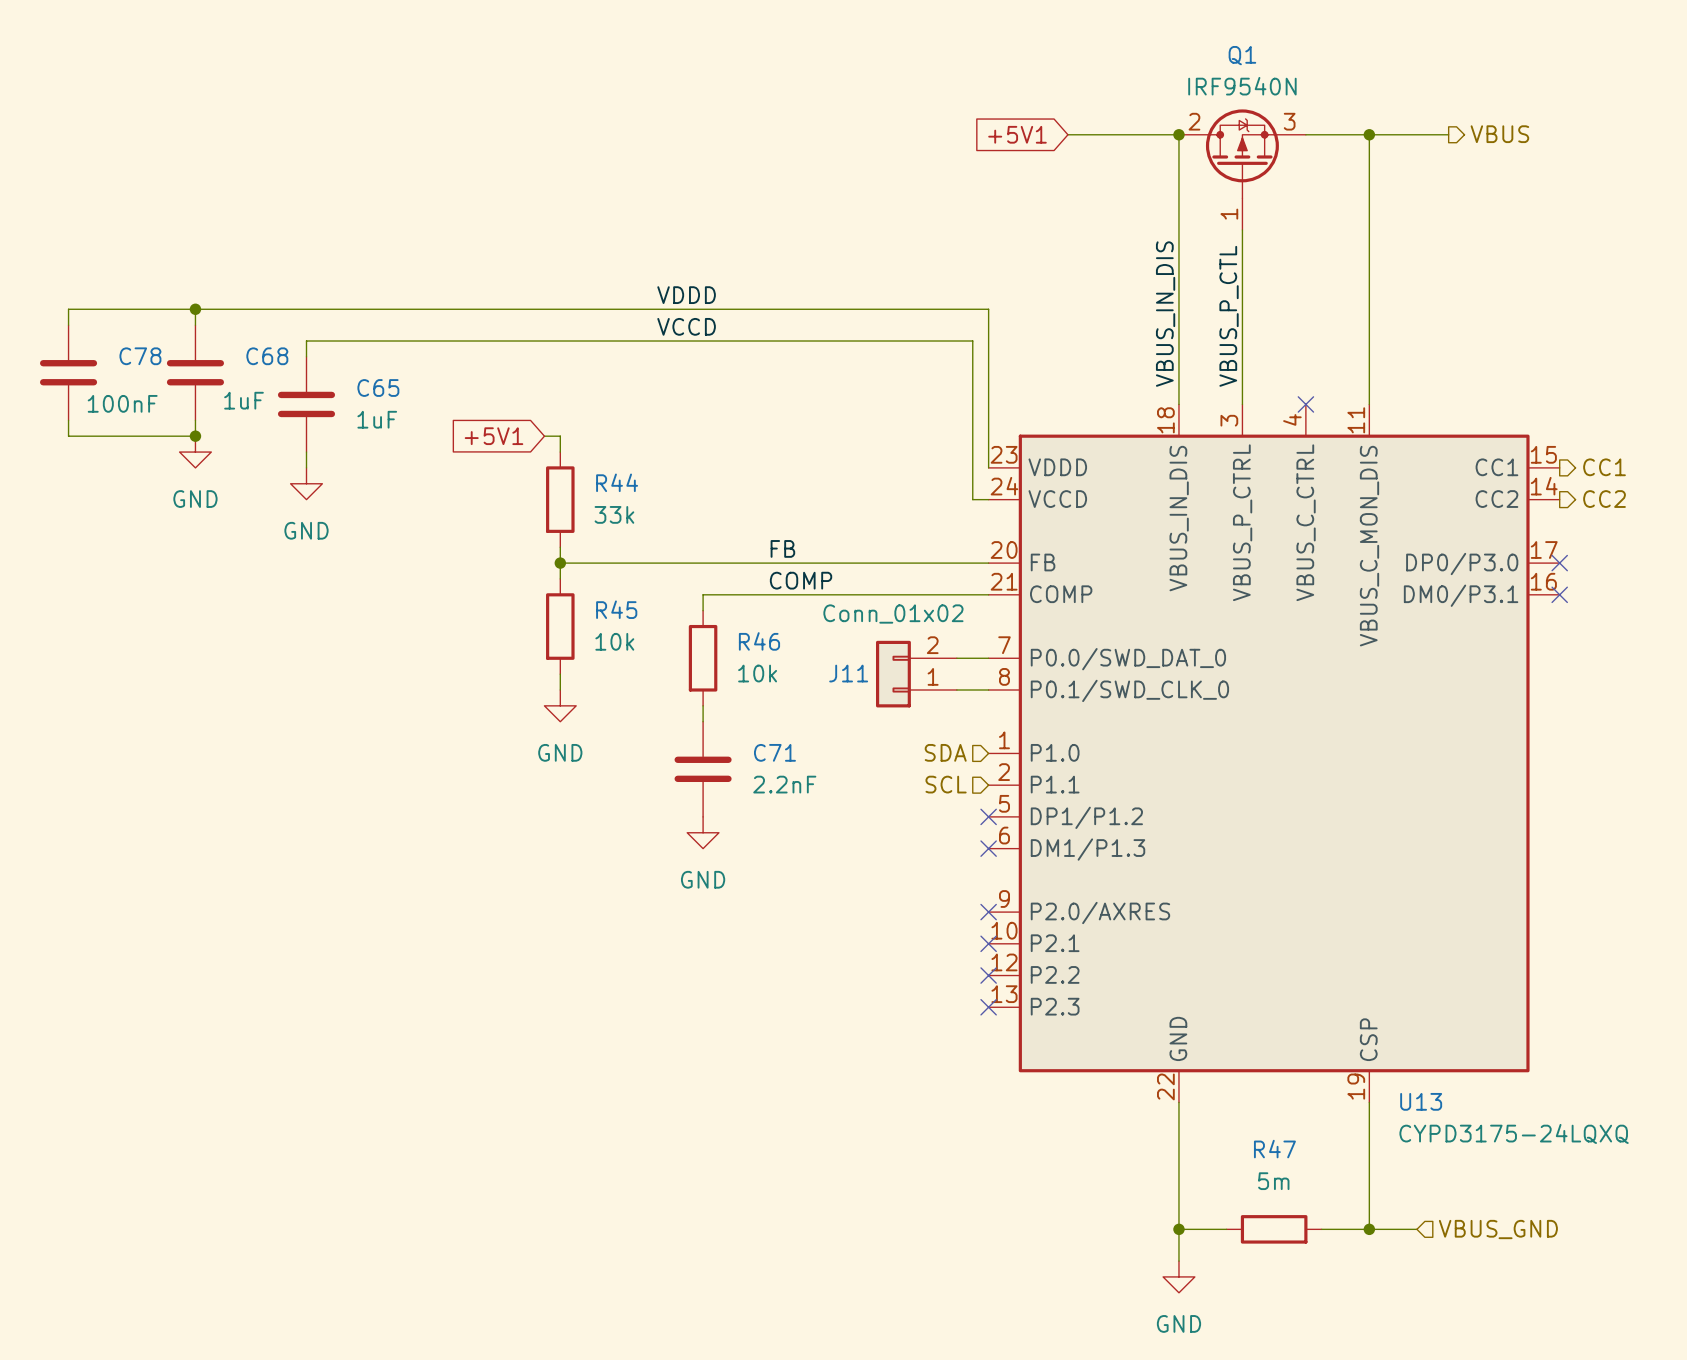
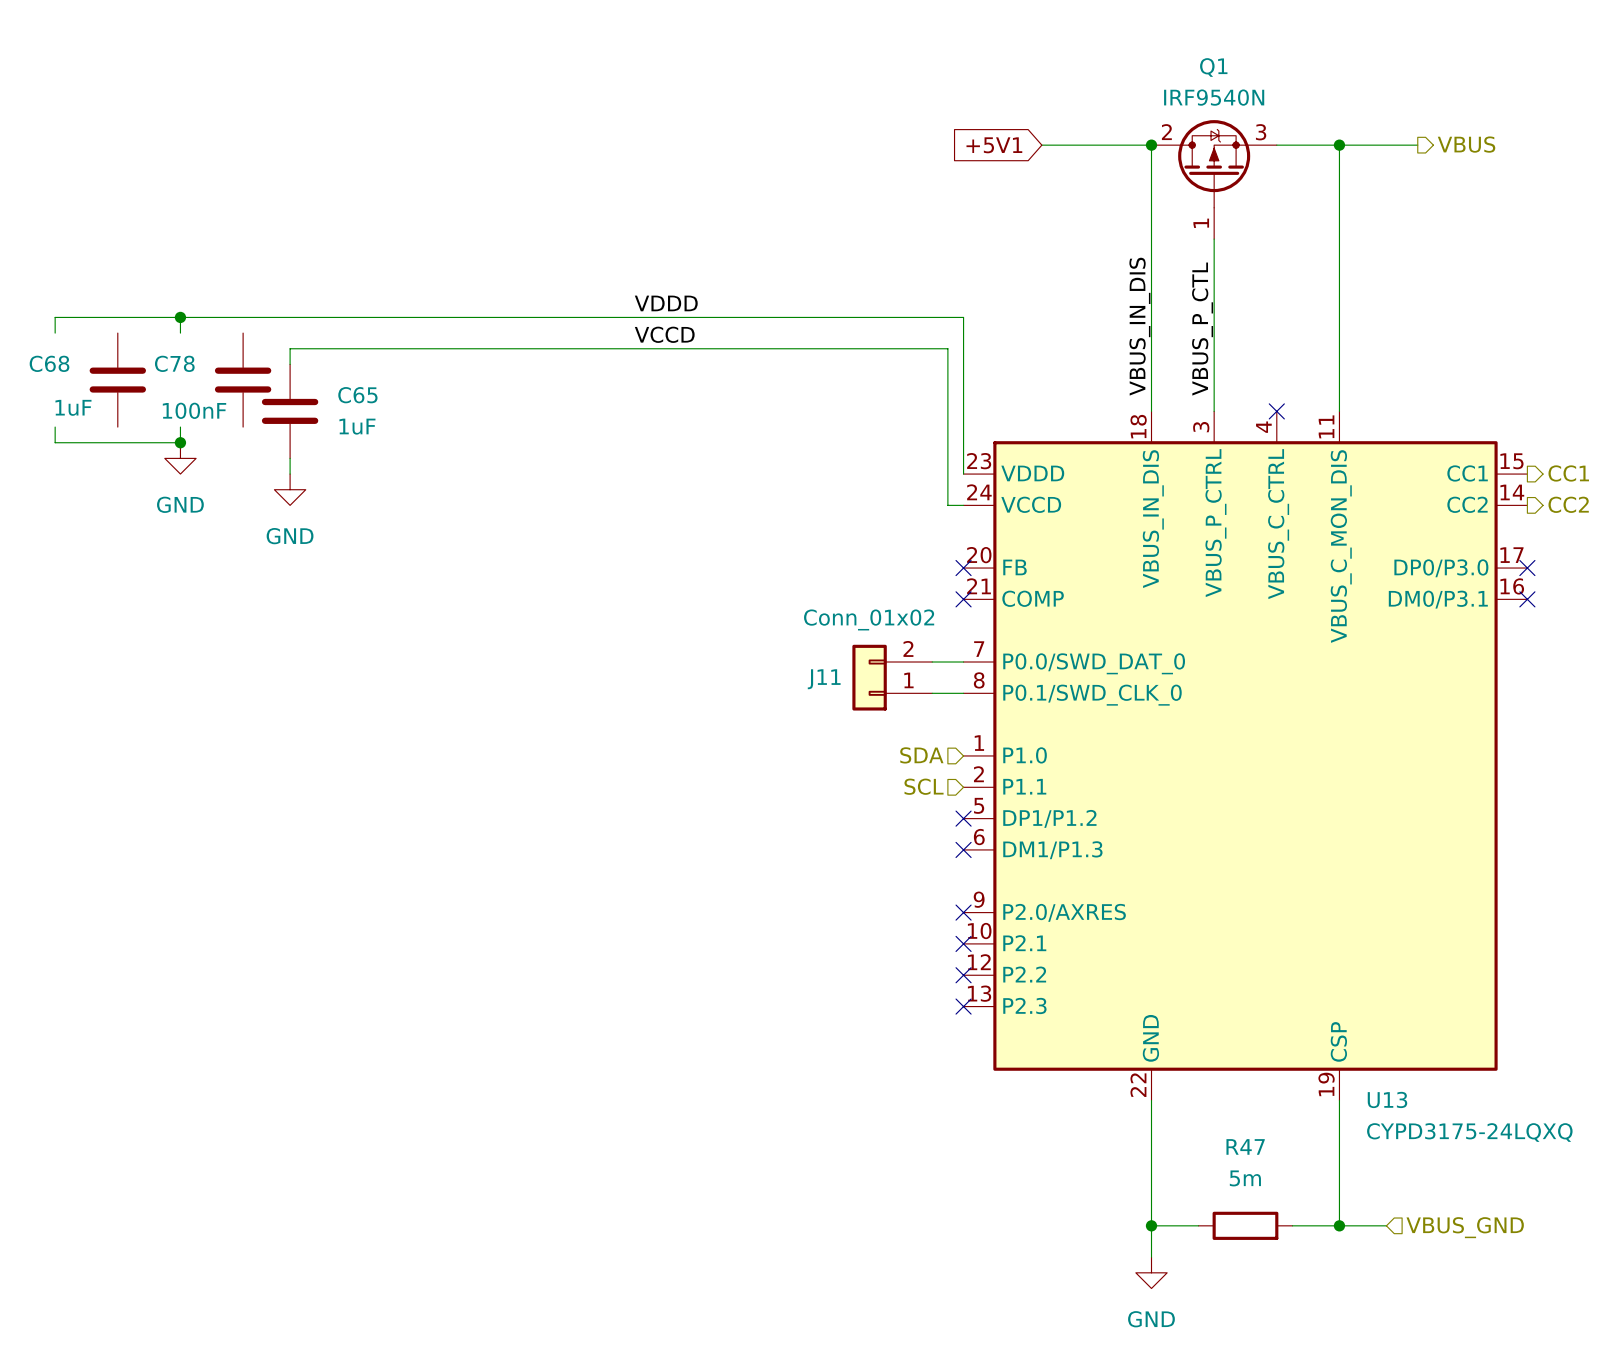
C78 name position: C78 (140, 356) -> C78 (174, 363)
C68 name position: C68 (267, 356) -> C68 (49, 363)
C78 position: (68, 372) -> (243, 380)
C68 position: (195, 372) -> (117, 380)
C68 value position: 1uF (243, 400) -> 1uF (73, 407)
C78 value position: 100nF (122, 403) -> 100nF (194, 410)
global label: +5V1 (494, 436) -> none
wire: (544, 436) (560, 436) (560, 452) -> none
R44: 33k (560, 499) -> none
wire: (560, 547) (560, 578) -> none
label: FB (782, 548) -> none
wire: (560, 563) (988, 563) -> none
junction: (560, 563) -> none
no-connect mark: none -> (963, 568)
label: COMP (801, 580) -> none
wire: (988, 594) (703, 594) (703, 610) -> none
no-connect mark: none -> (963, 599)
R45: 10k (560, 626) -> none
R46: 10k (703, 658) -> none
wire: (560, 674) (560, 689) -> none
power symbol: GND (560, 705) -> none
wire: (703, 705) (703, 721) -> none
C71: 2.2nF (703, 769) -> none
power symbol: GND (703, 832) -> none

